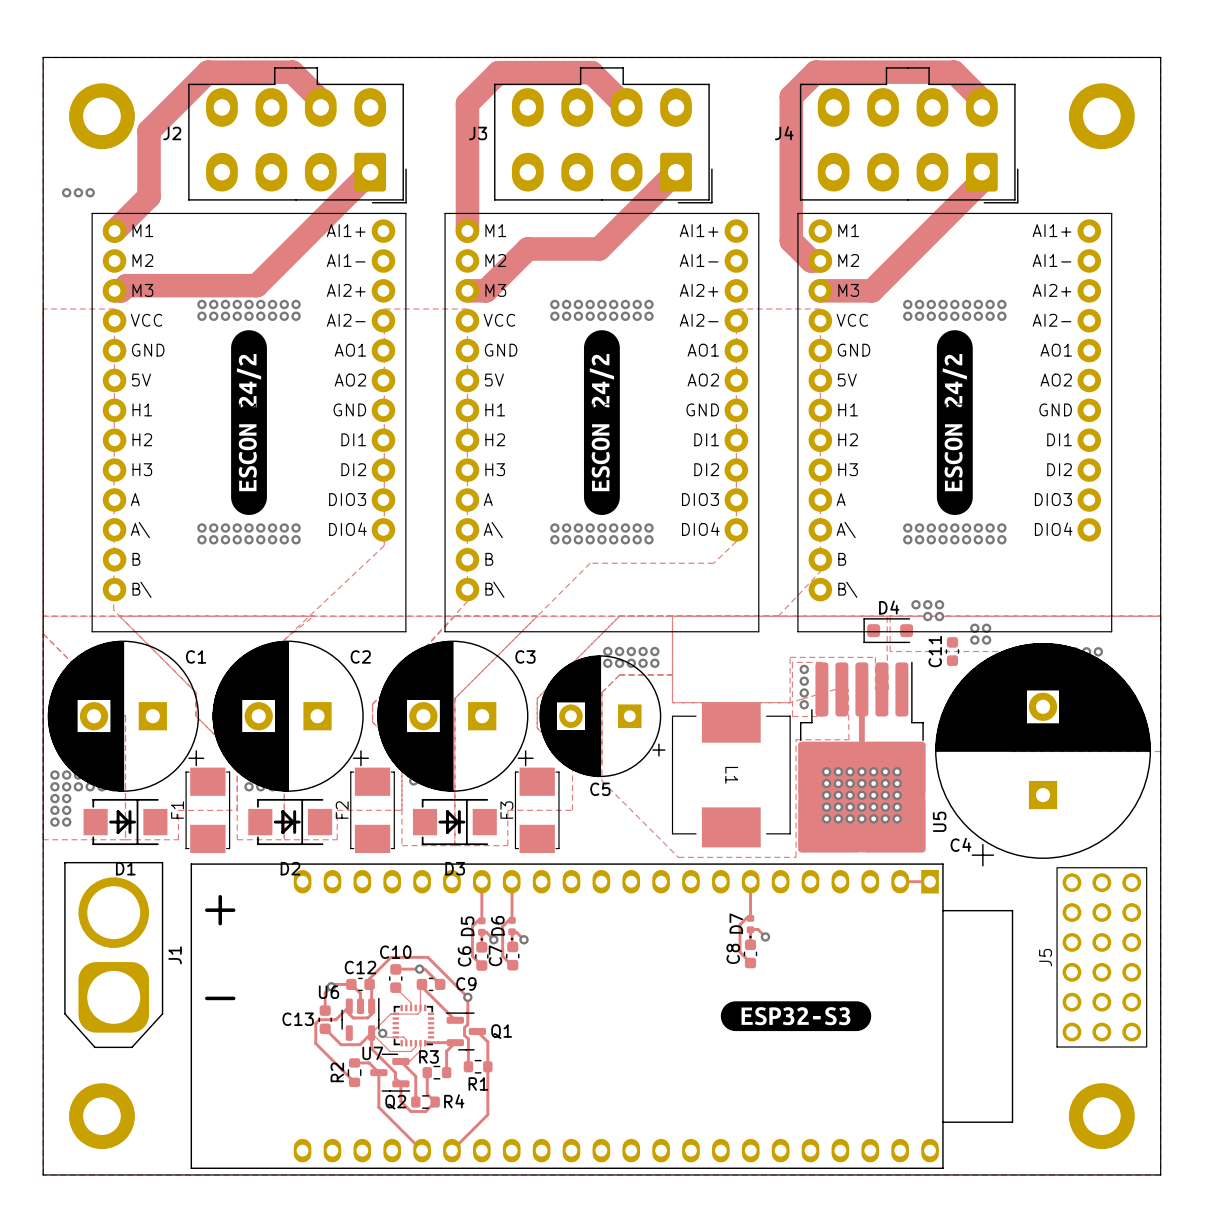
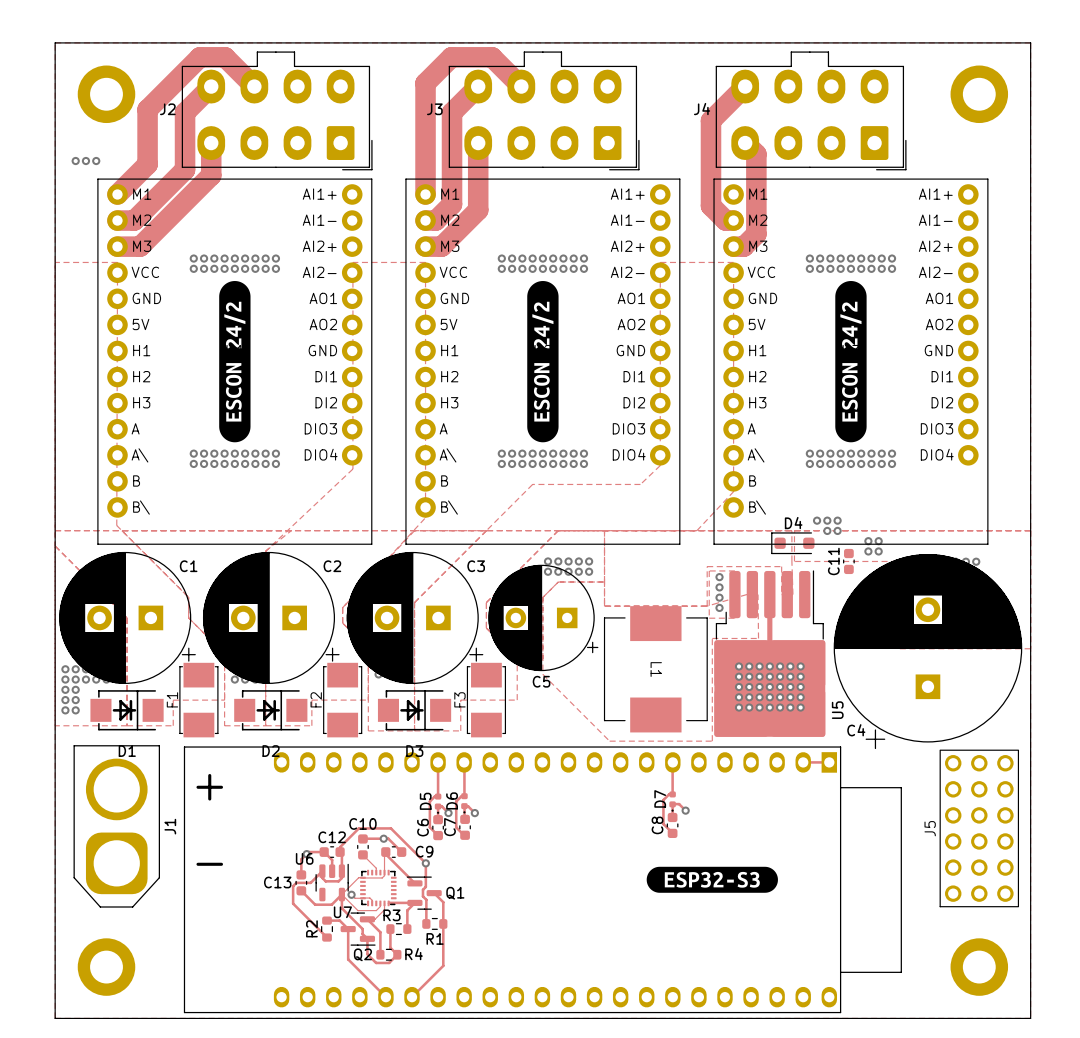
track: (497, 73) (591, 72) (626, 107) -> (451, 57) (492, 57) (521, 86)
track: none -> (211, 86) (185, 112) (185, 169) (134, 220) (117, 220)
track: (320, 107) (320, 100) (292, 72) (207, 72) (149, 131) (149, 133) -> (254, 86) (225, 57) (199, 57) (147, 109)
track: none -> (478, 86) (452, 112) (452, 204) (435, 220) (425, 220)
track: (981, 107) (981, 100) (953, 72) (815, 72) (791, 96) (791, 240) (794, 244) -> (745, 86) (710, 120) (710, 205)
track: (370, 172) (256, 285) (126, 285) (121, 290) -> (211, 143) (211, 175) (140, 246) (123, 246)
track: (676, 172) (599, 248) (527, 248) -> (478, 143) (478, 210)
track: (981, 172) (981, 180) (872, 290) (832, 290) -> (745, 143) (756, 154) (756, 234) (743, 246)

